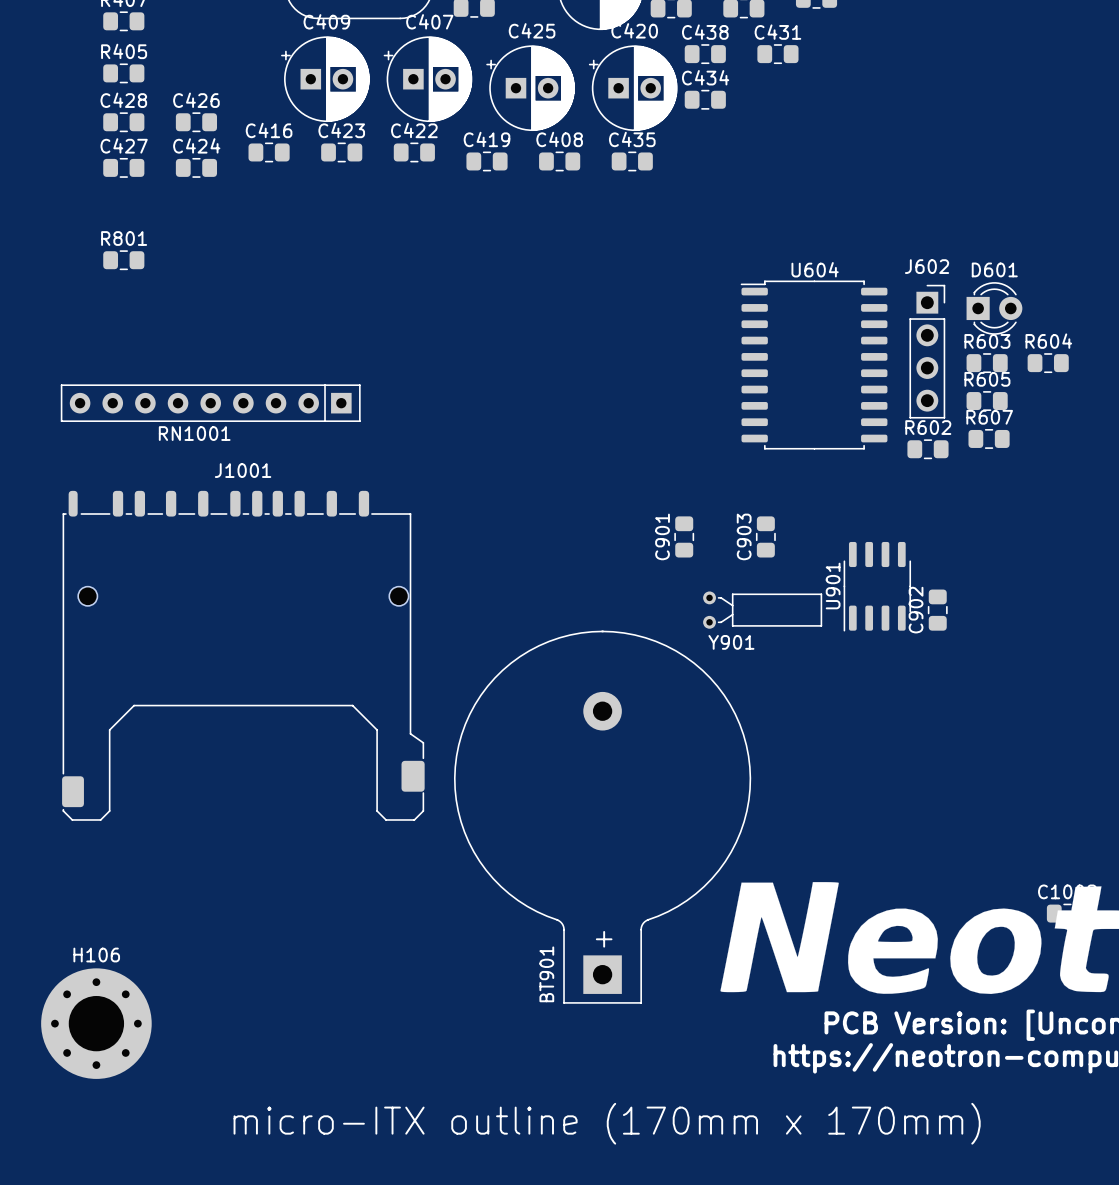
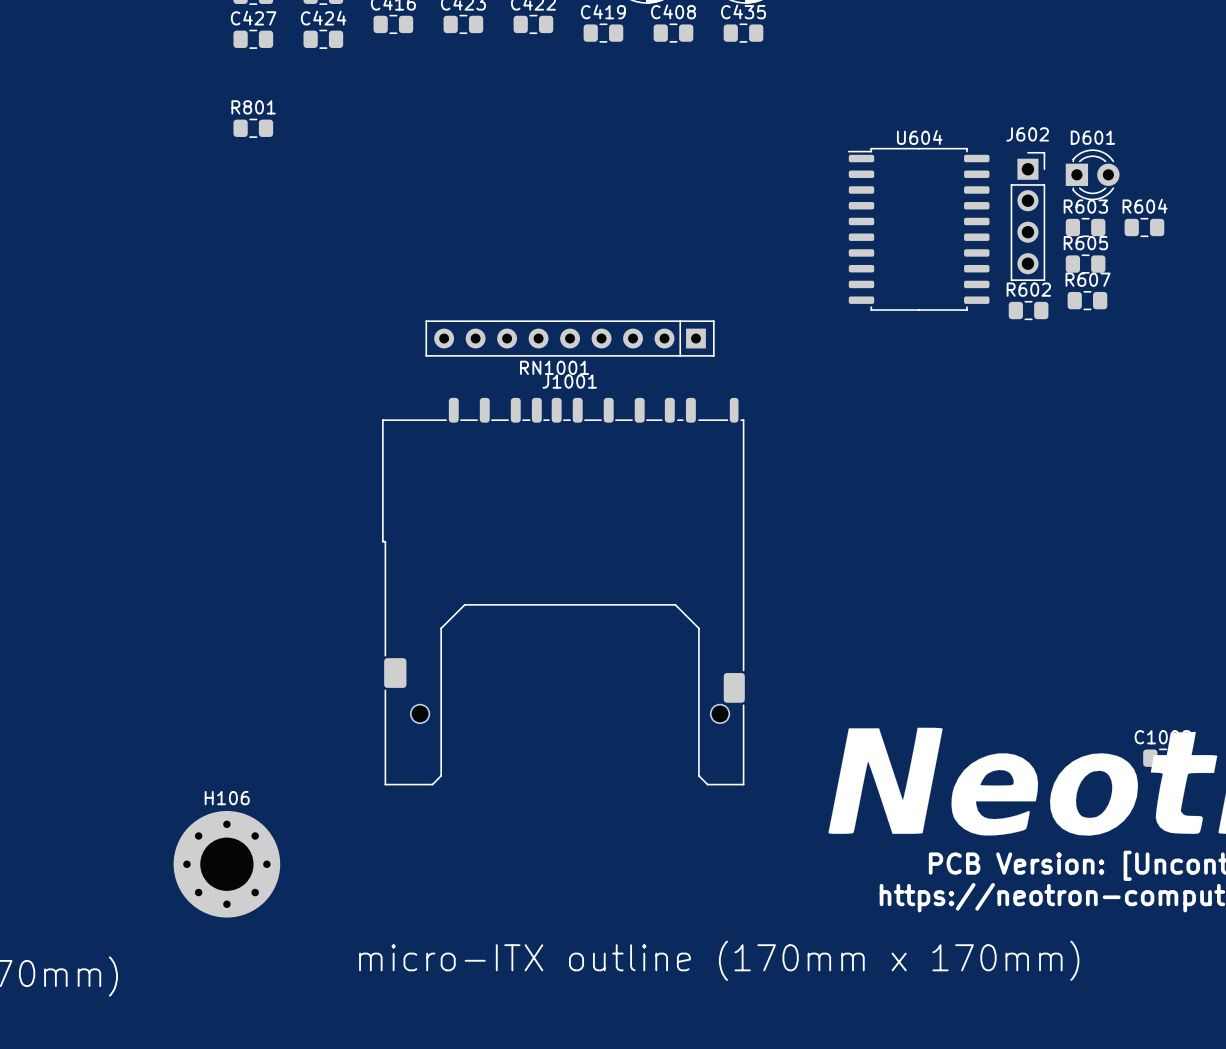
RN1001 position: (210, 403) -> (570, 338)
J1001 name position: J1001 (243, 470) -> J1001 (569, 381)
J1001 footprint: [62, 490, 425, 821] -> [382, 397, 745, 786]
C901: (684, 536) -> none
C903: (765, 536) -> none
U901: (877, 586) -> none
Y901: (762, 610) -> none
C902: (937, 610) -> none
BT901: (602, 817) -> none

